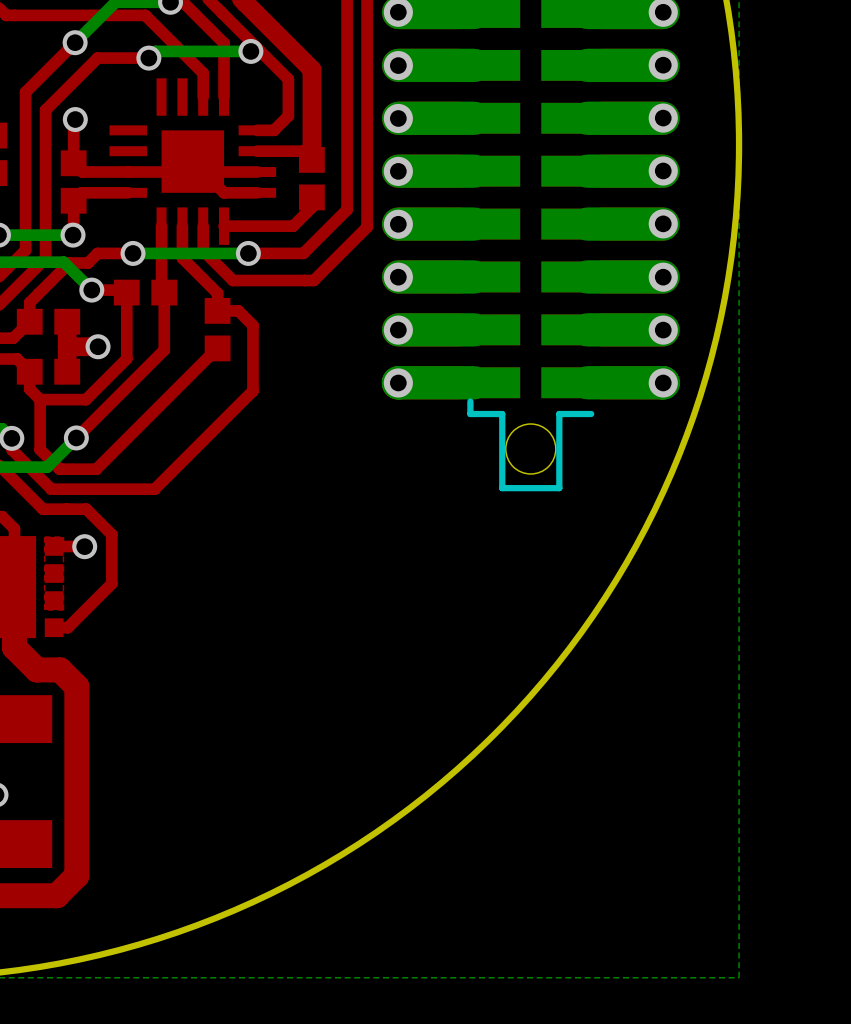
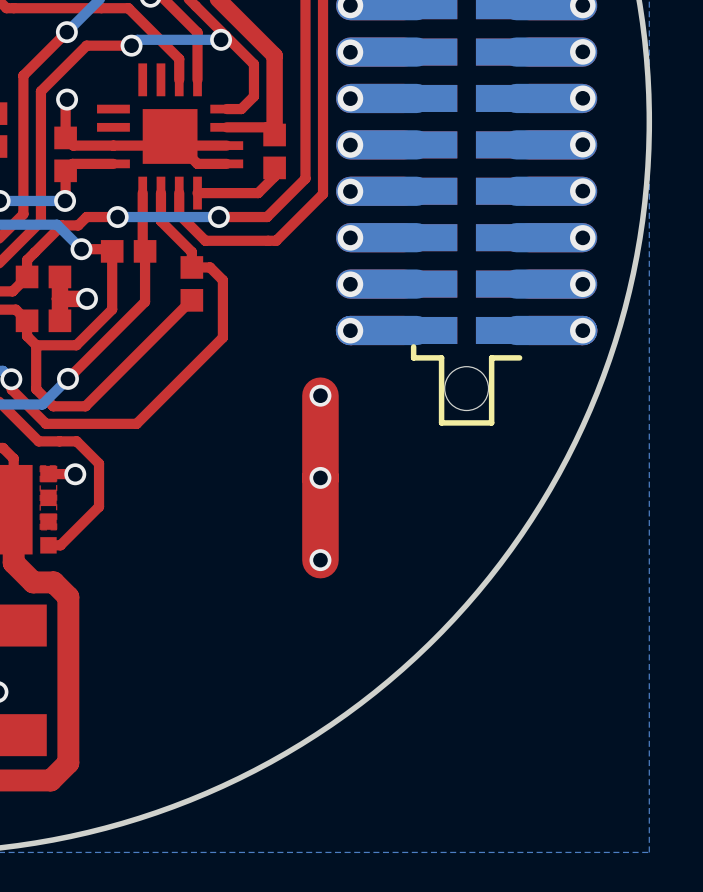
top track: none -> (320, 395) (320, 560)
via: none -> (320, 395)
via: none -> (320, 477)
via: none -> (320, 560)

